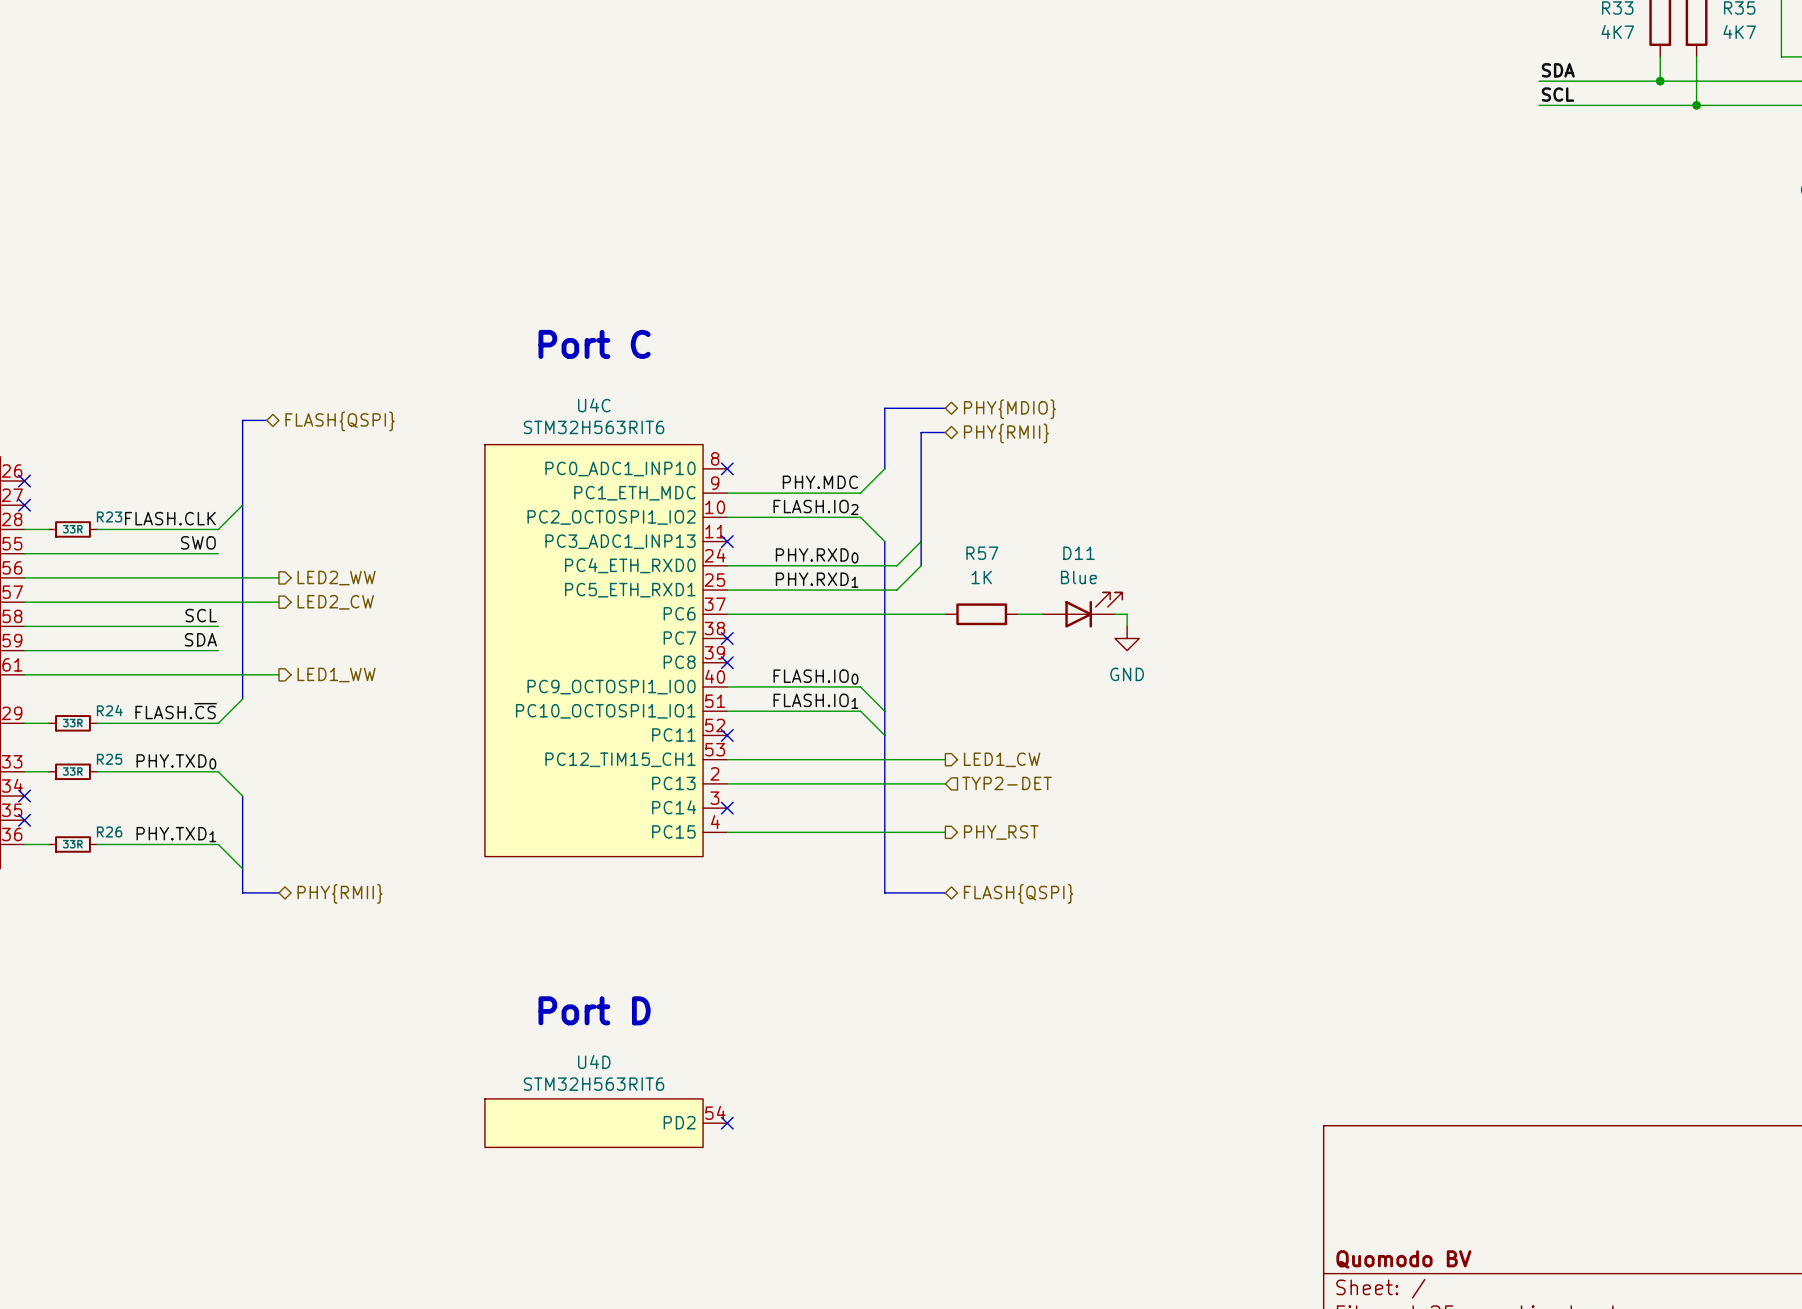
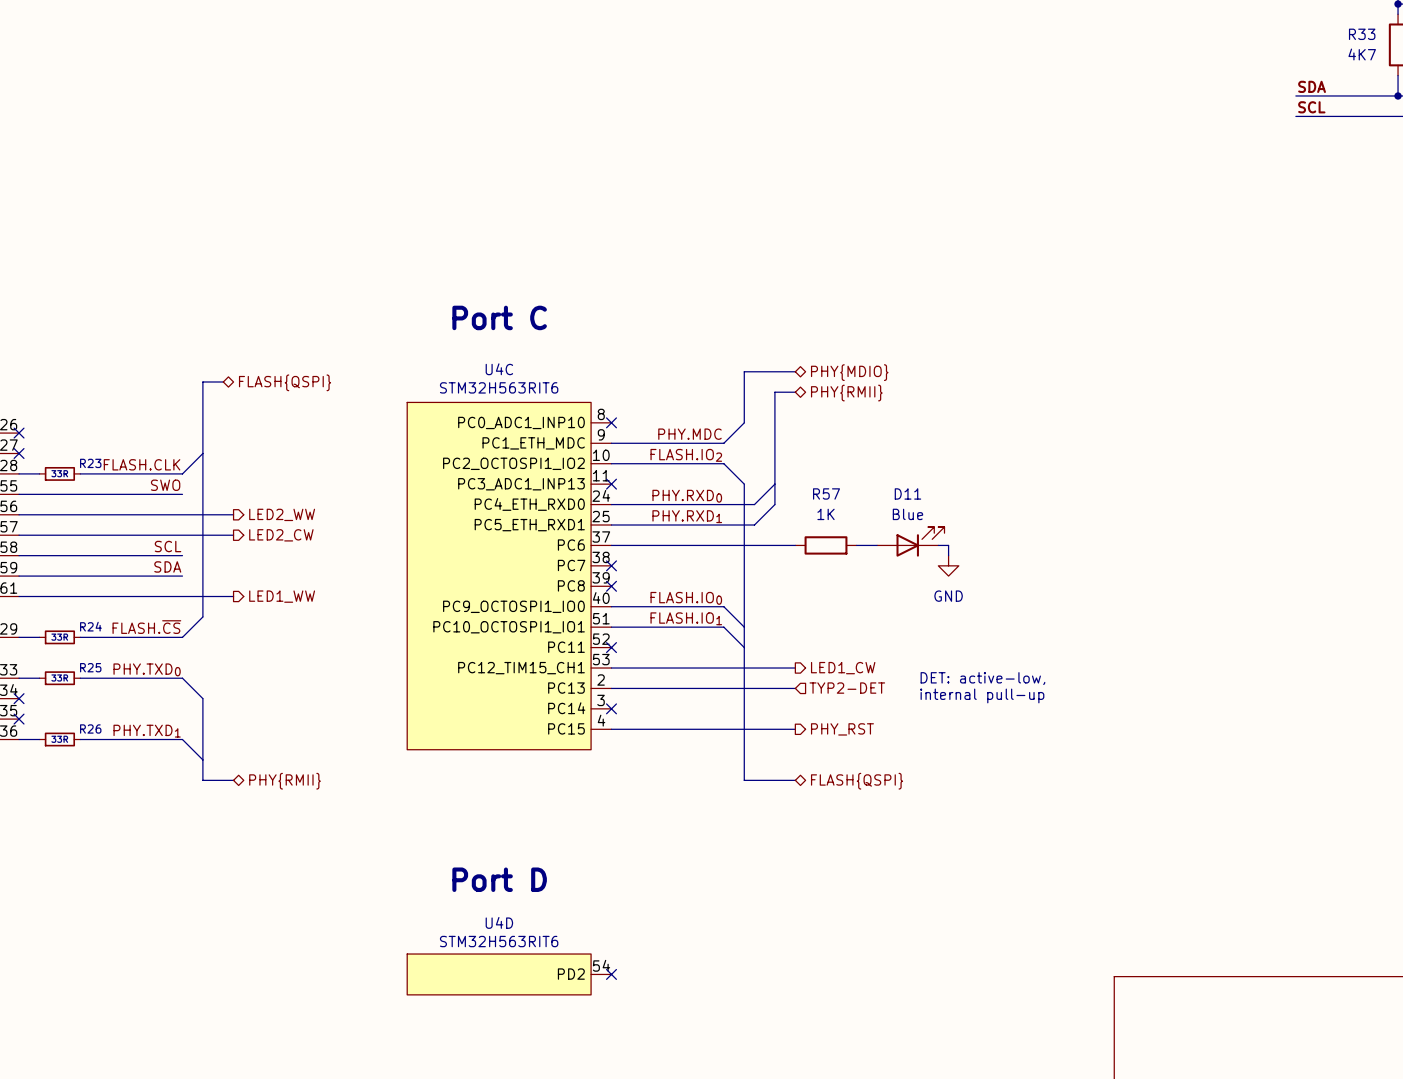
text: none -> DET: active-low, (982, 678)
text: none -> internal pull-up (982, 695)

